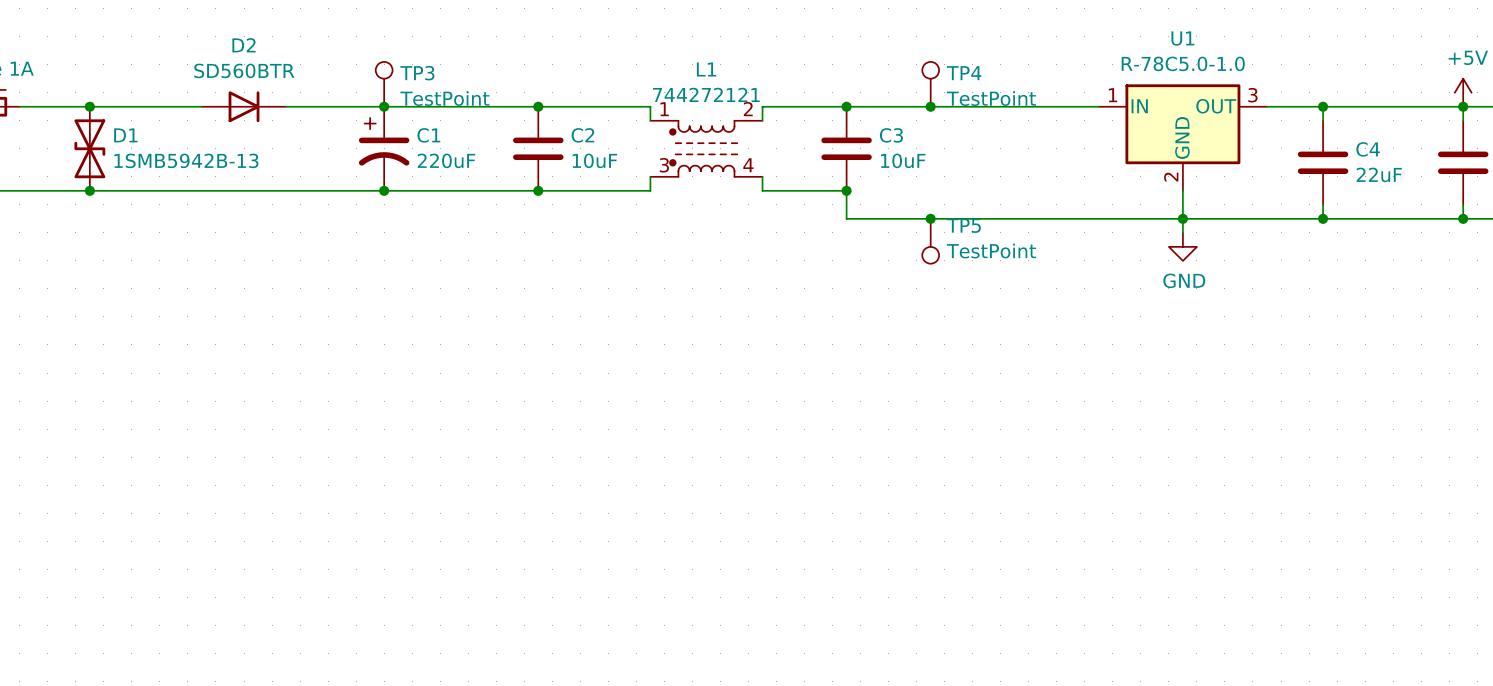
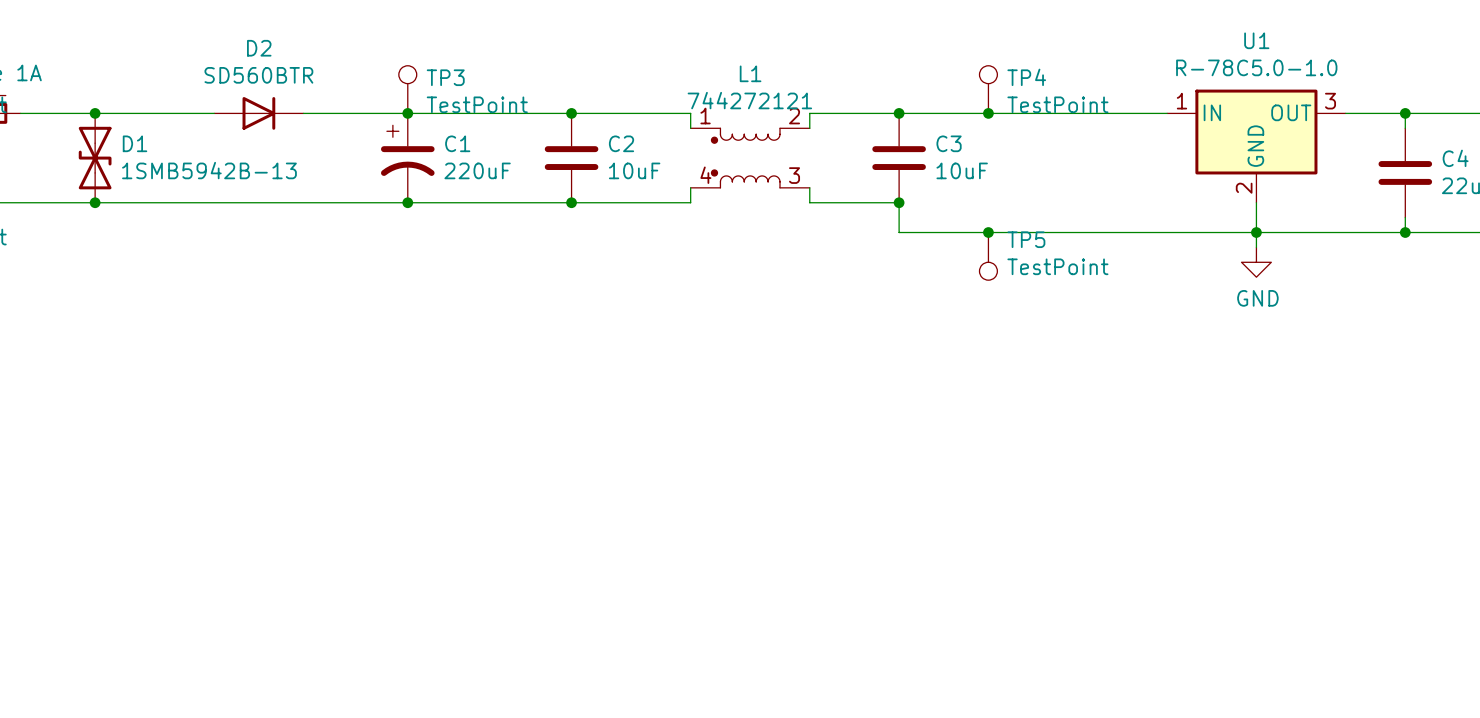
L1 symbol: [650, 120, 763, 177] -> [690, 128, 810, 188]

